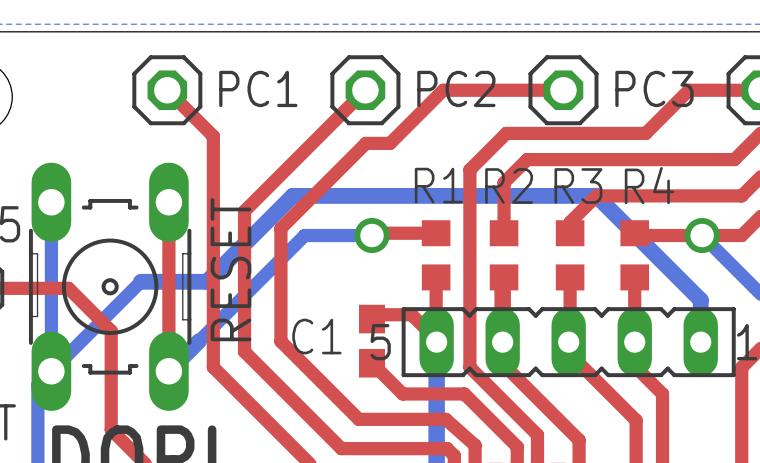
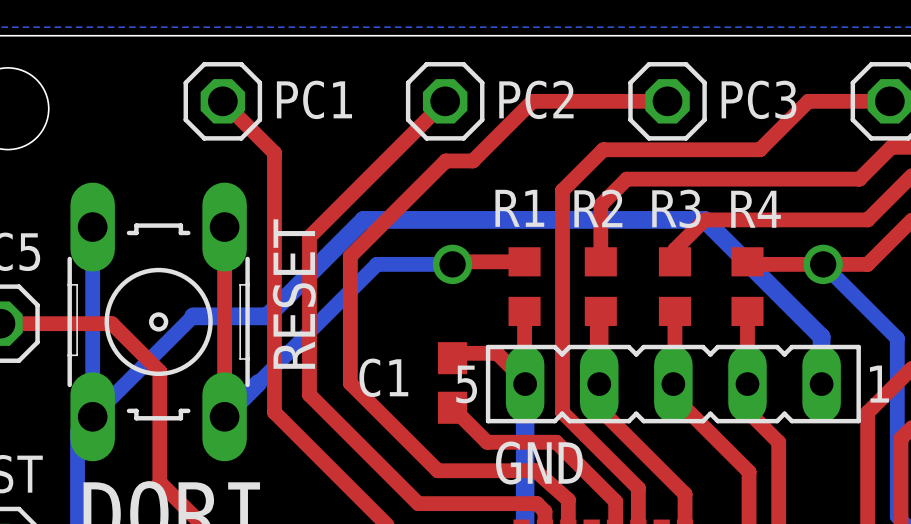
text: none -> GND (539, 463)

